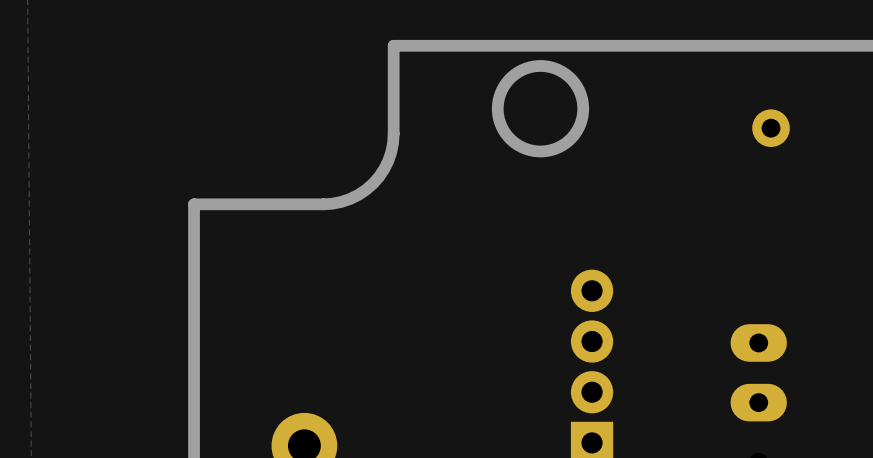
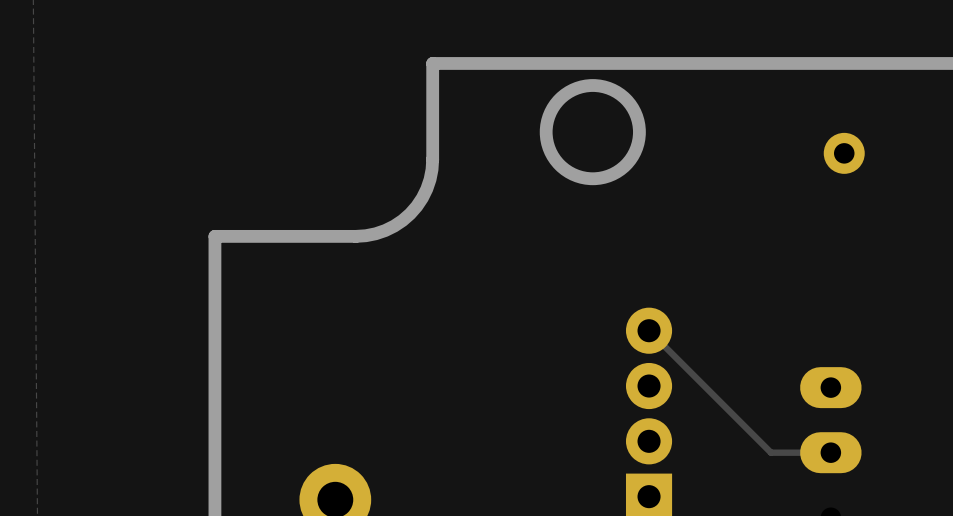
track: none -> (649, 330) (771, 452) (830, 452)

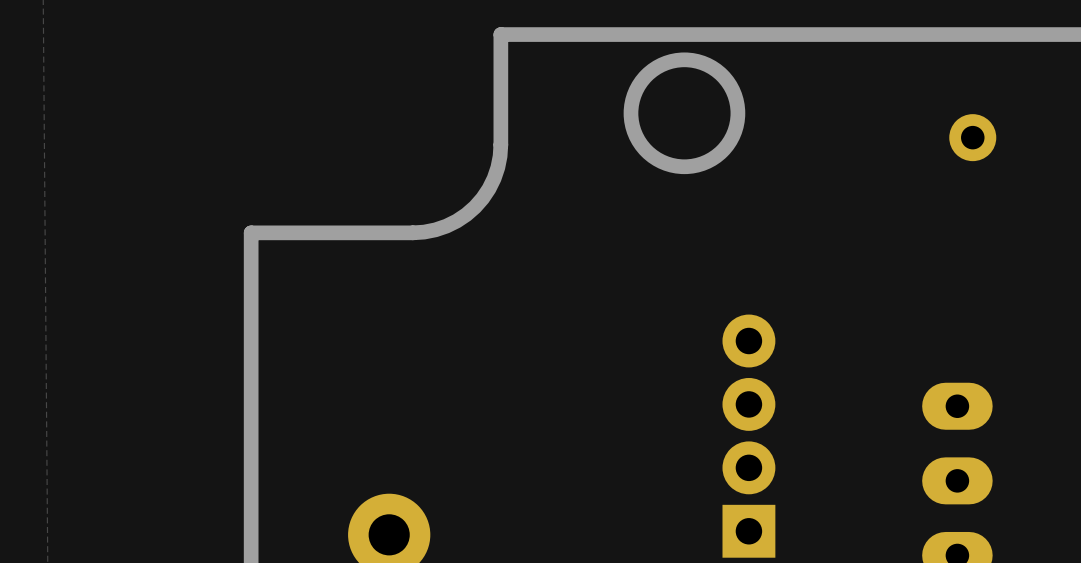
track: (649, 330) (771, 452) (830, 452) -> none

